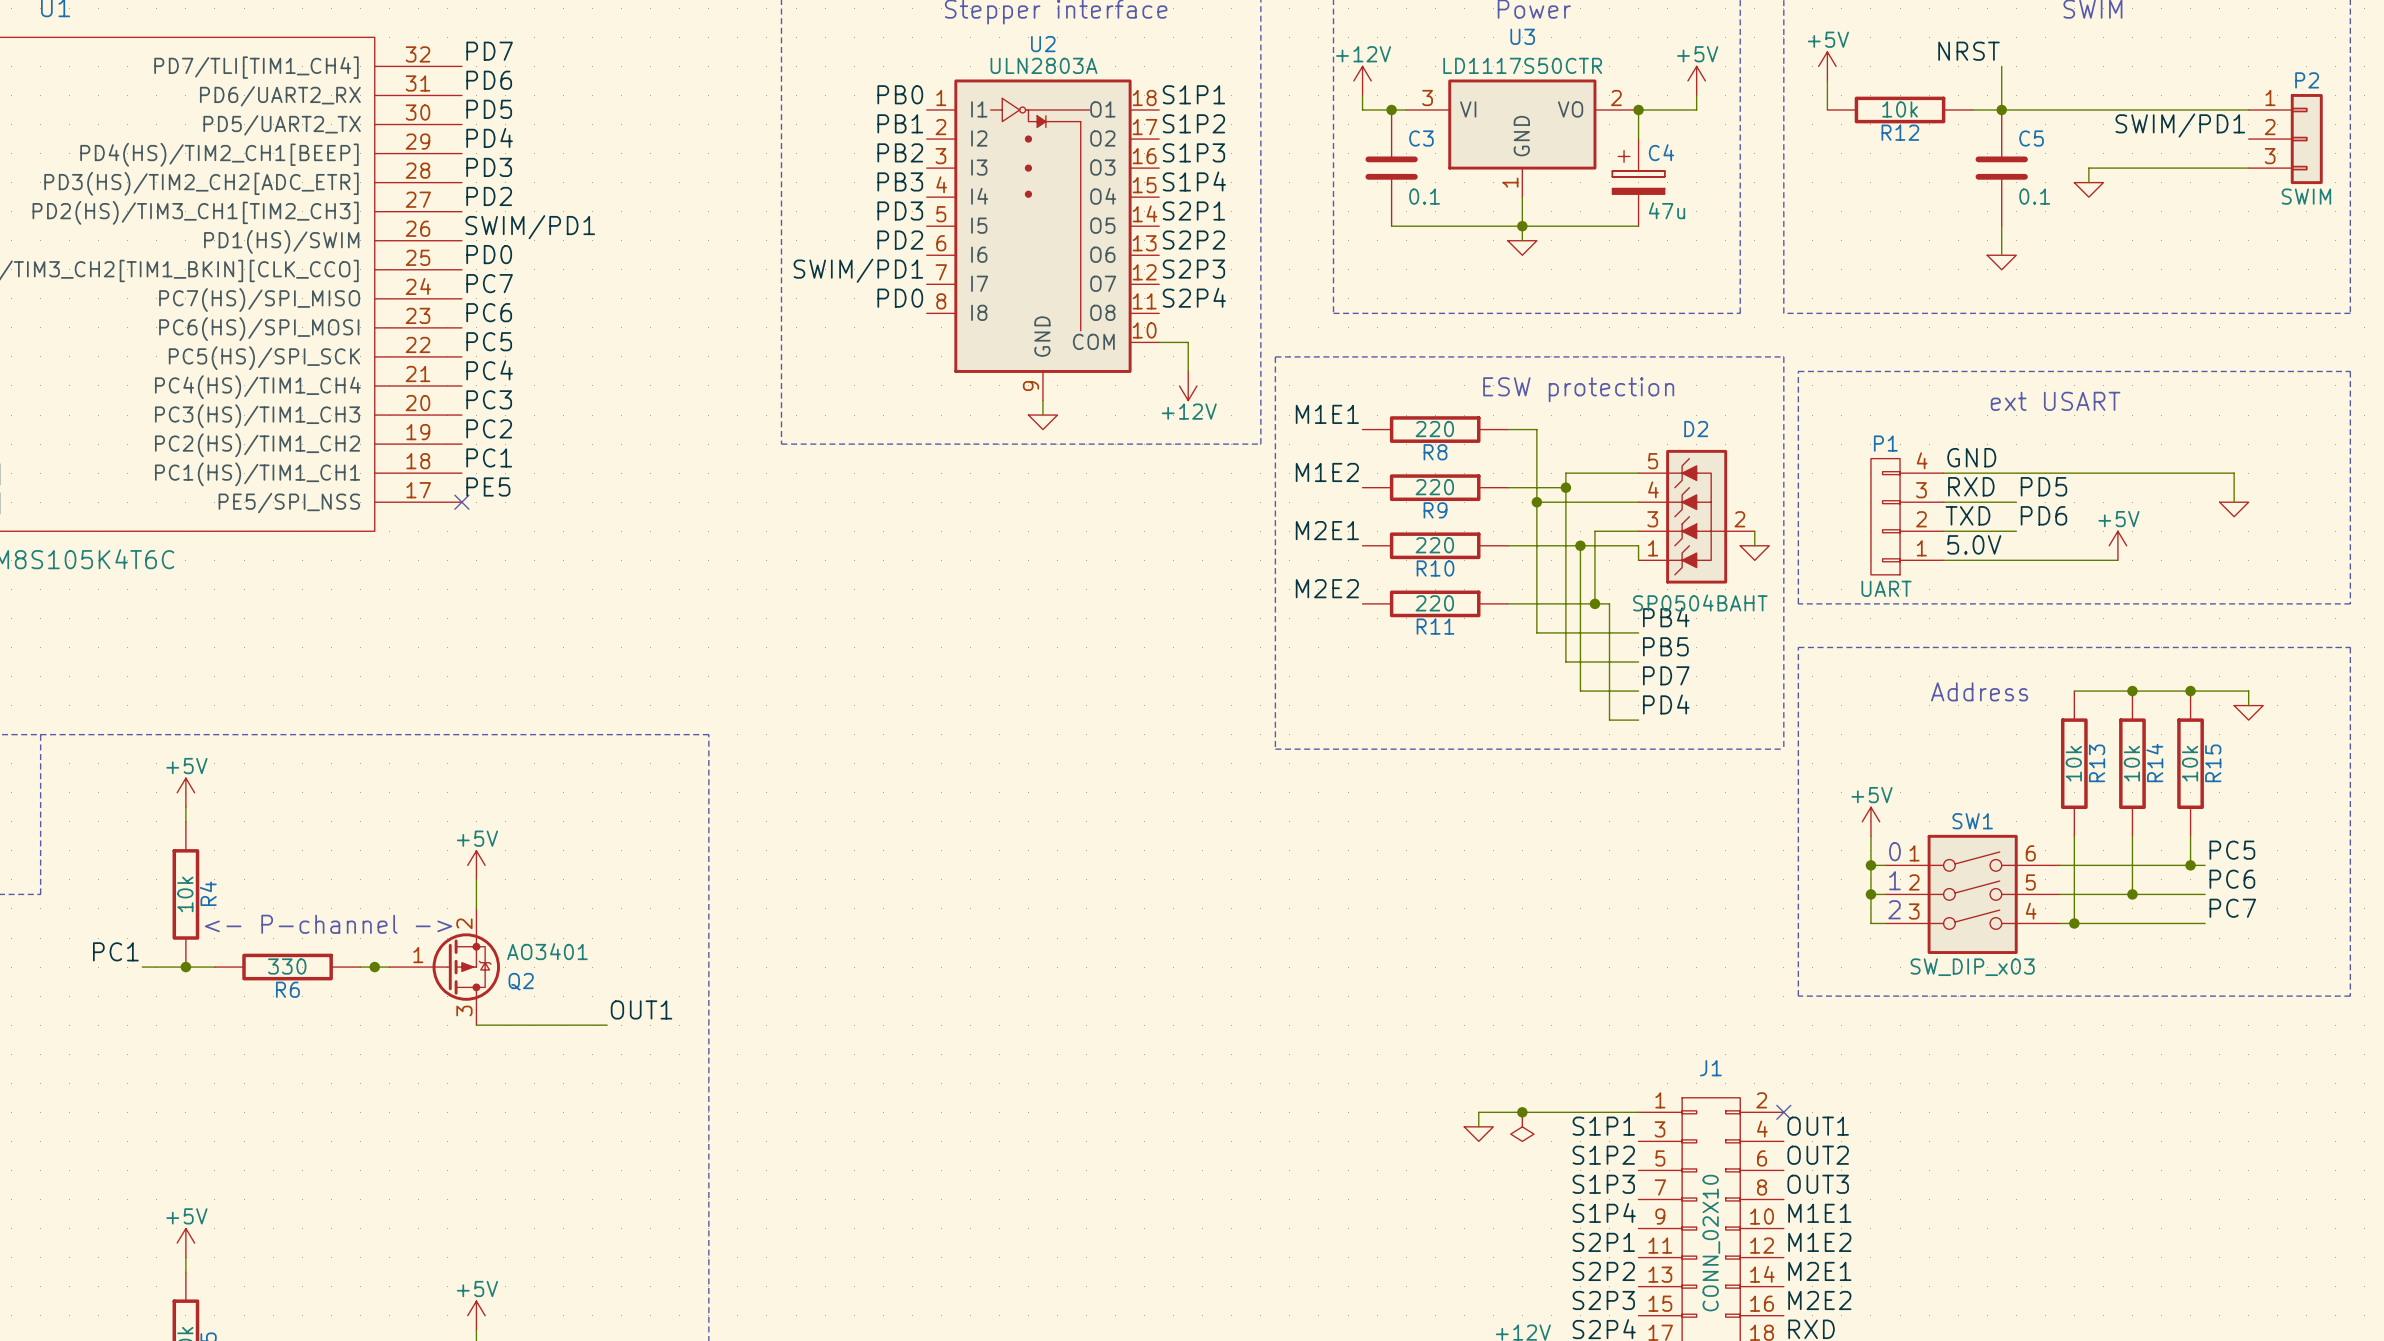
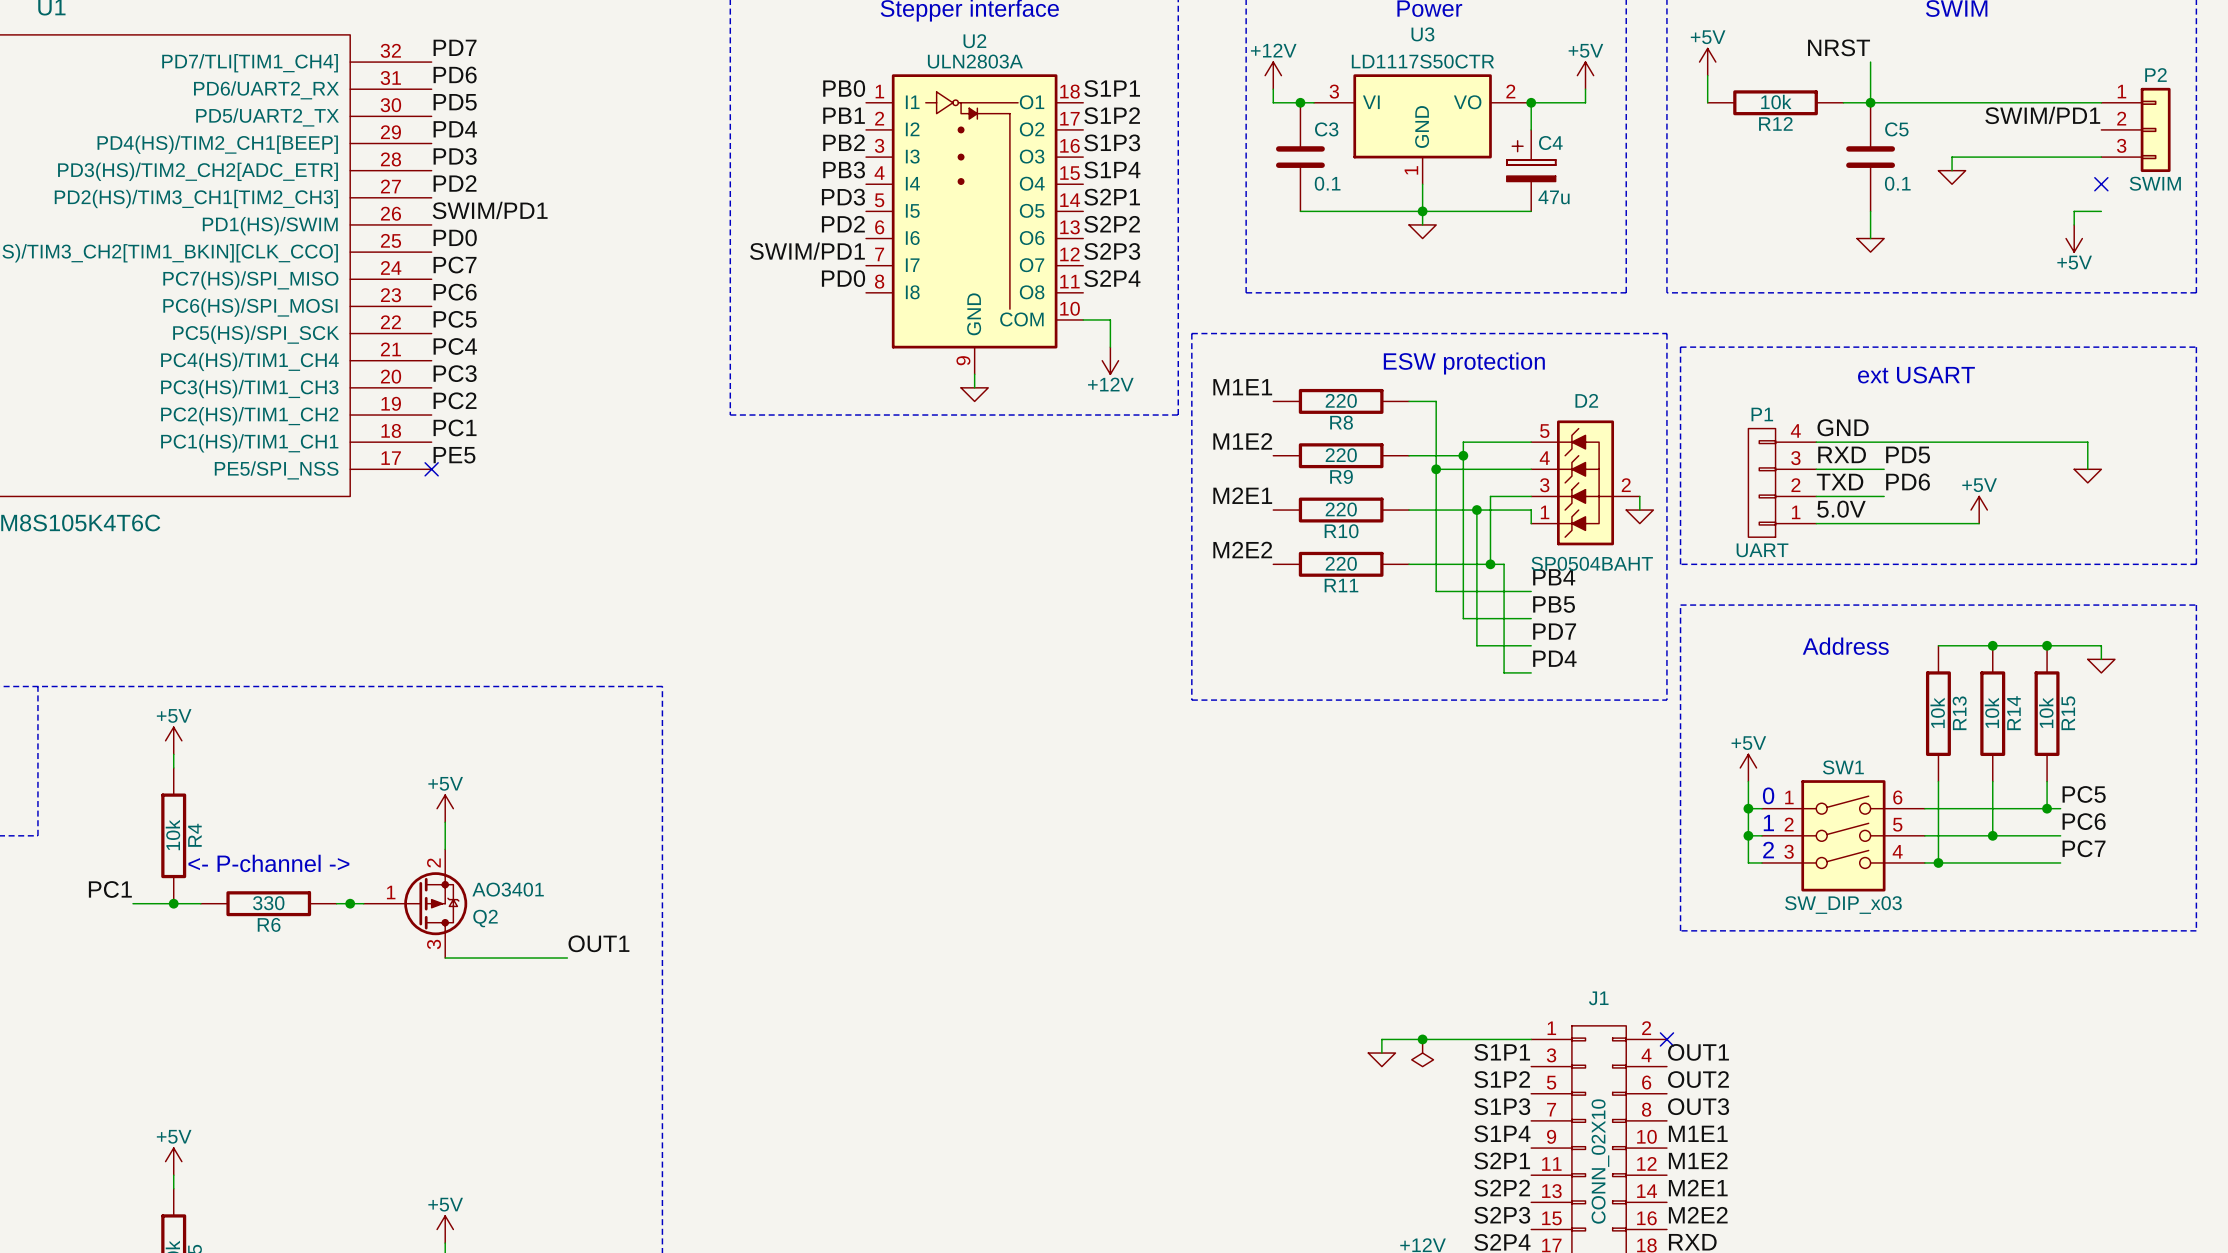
no-connect mark: none -> (2101, 184)
wire: none -> (2101, 211) (2074, 211) (2074, 224)
power symbol: none -> +5V (2074, 238)

